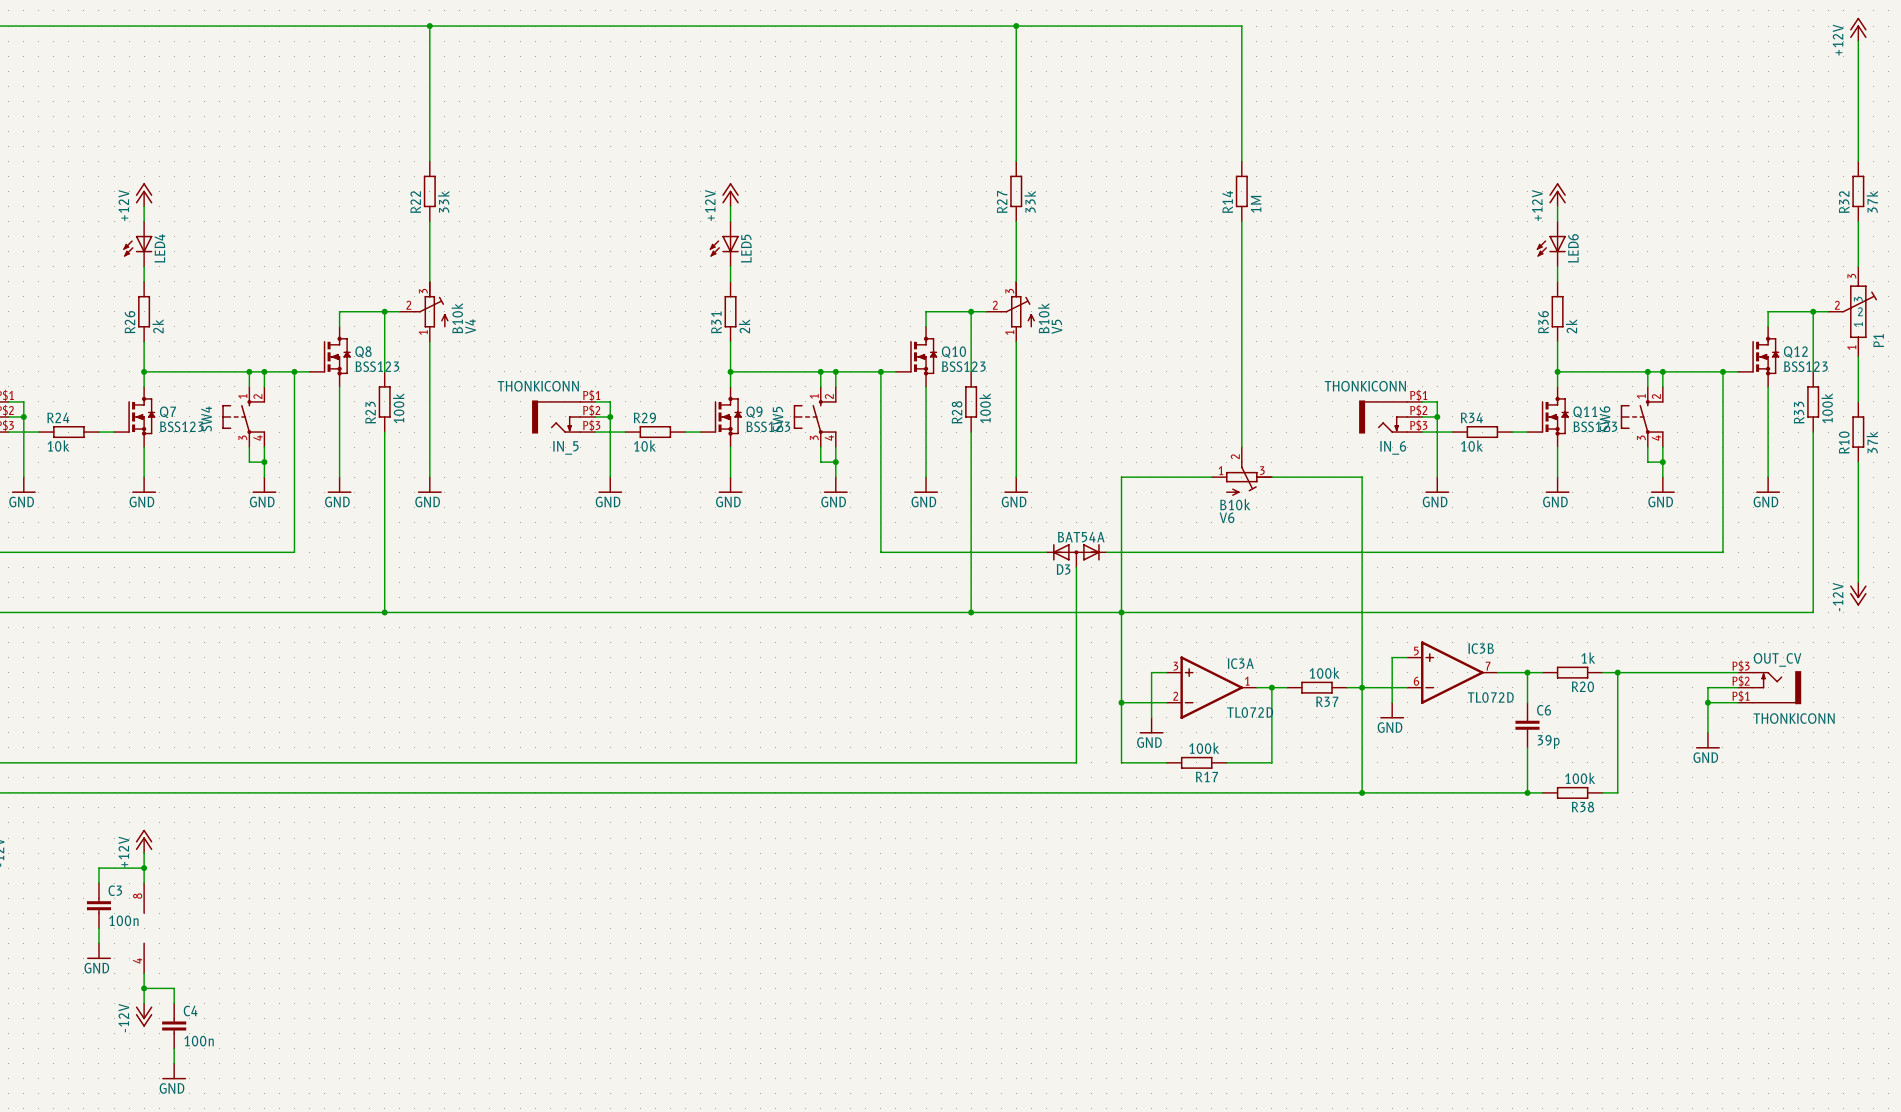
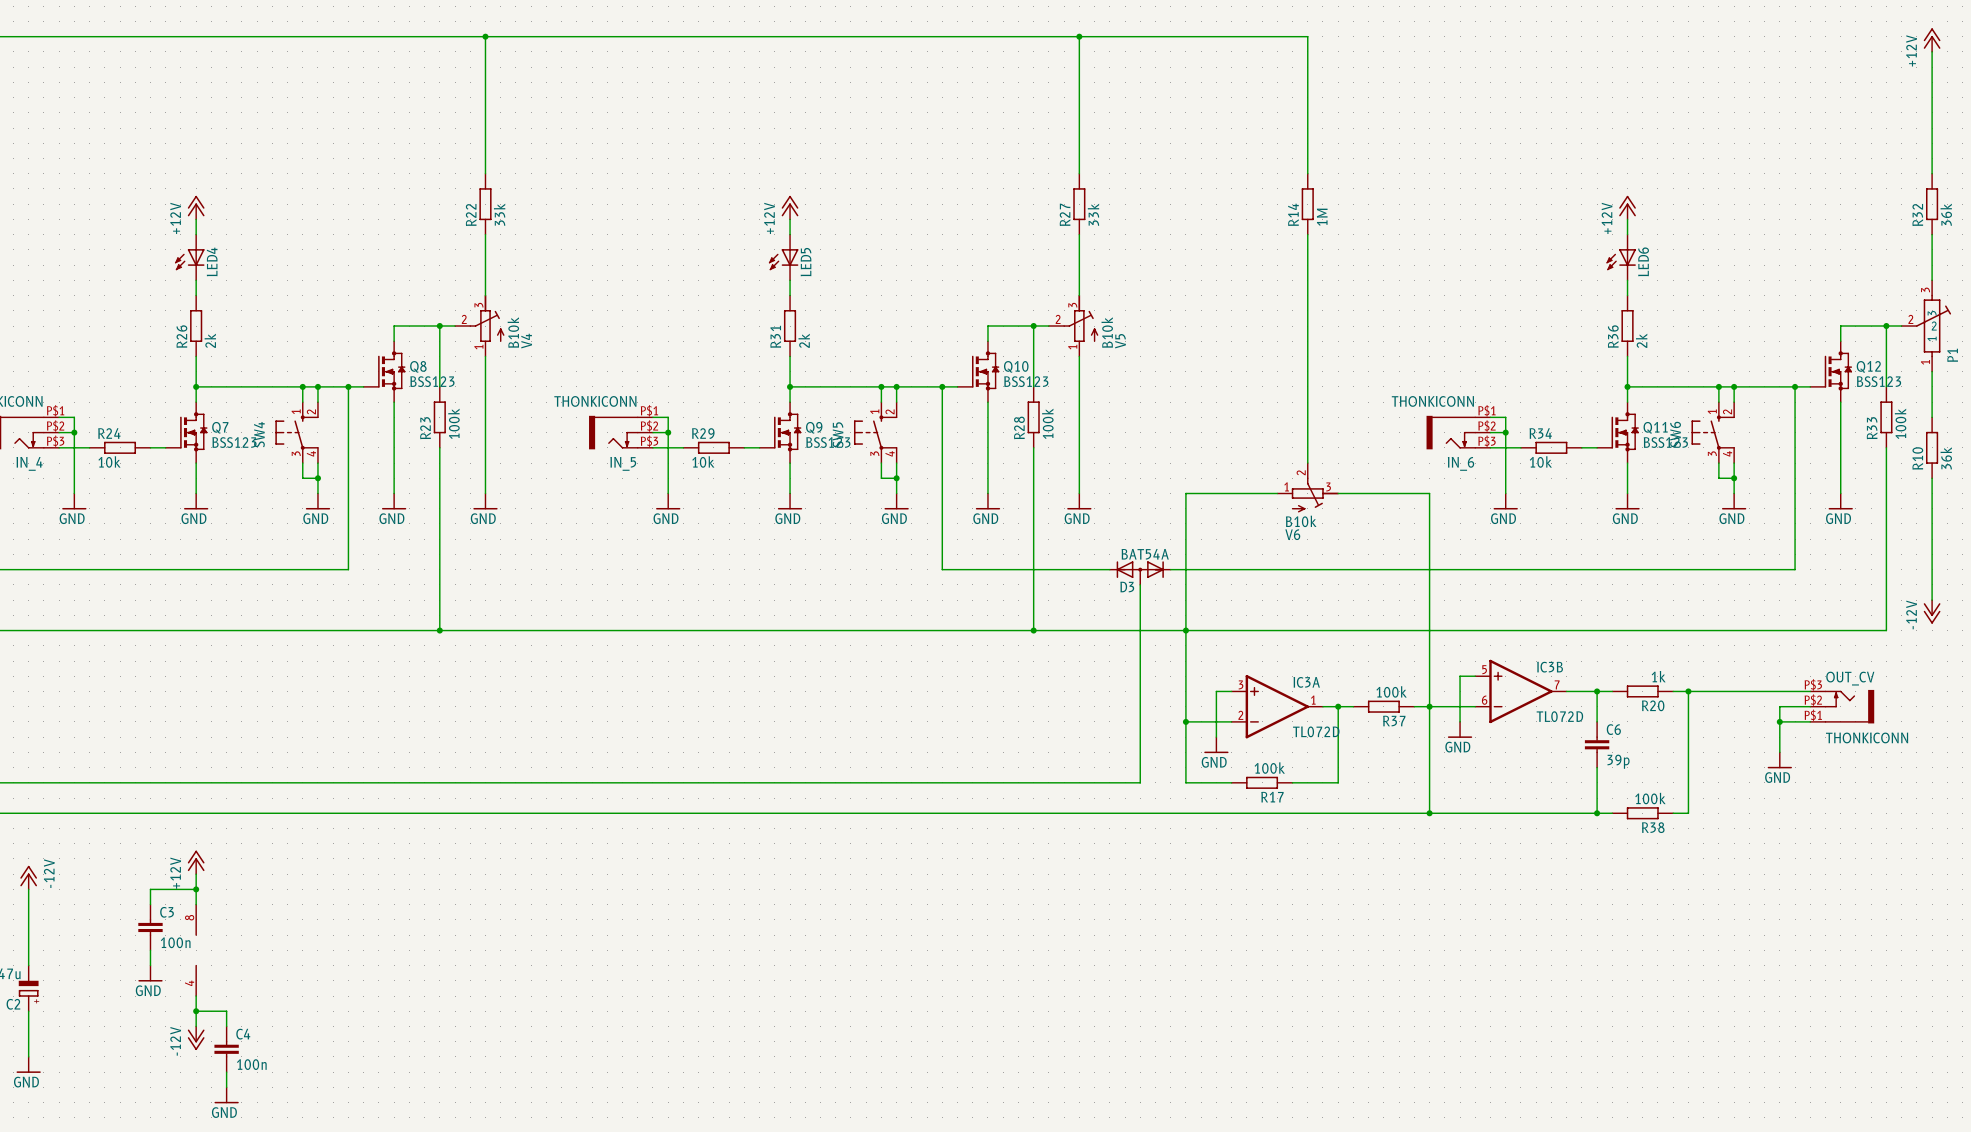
R32 value: 37k (1872, 201) -> 36k (1946, 214)
R10 value: 37k (1872, 442) -> 36k (1946, 458)

